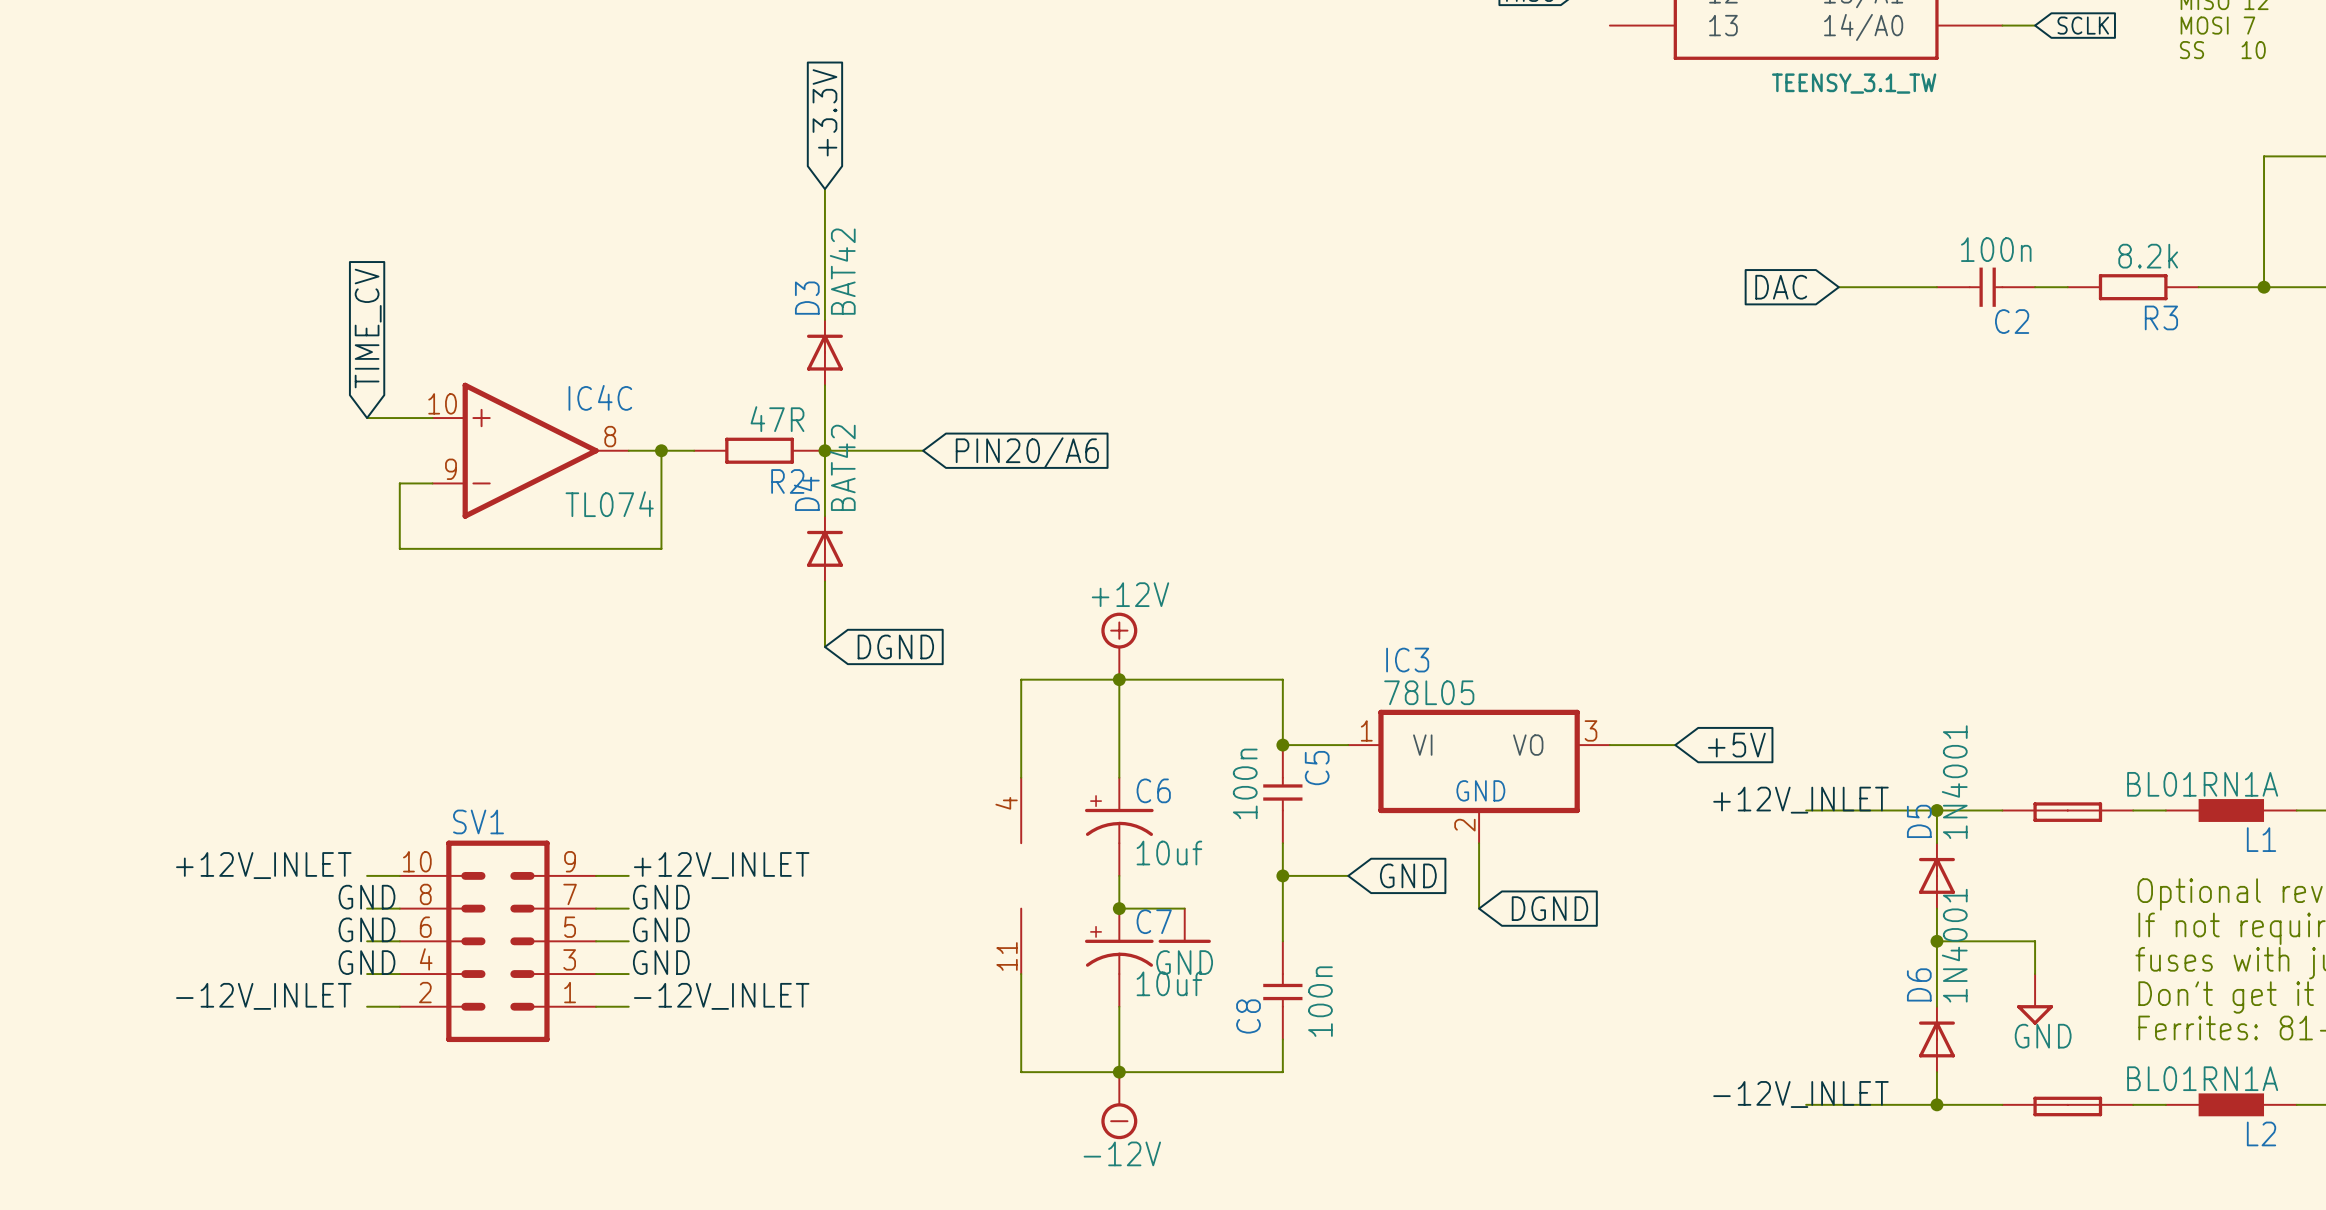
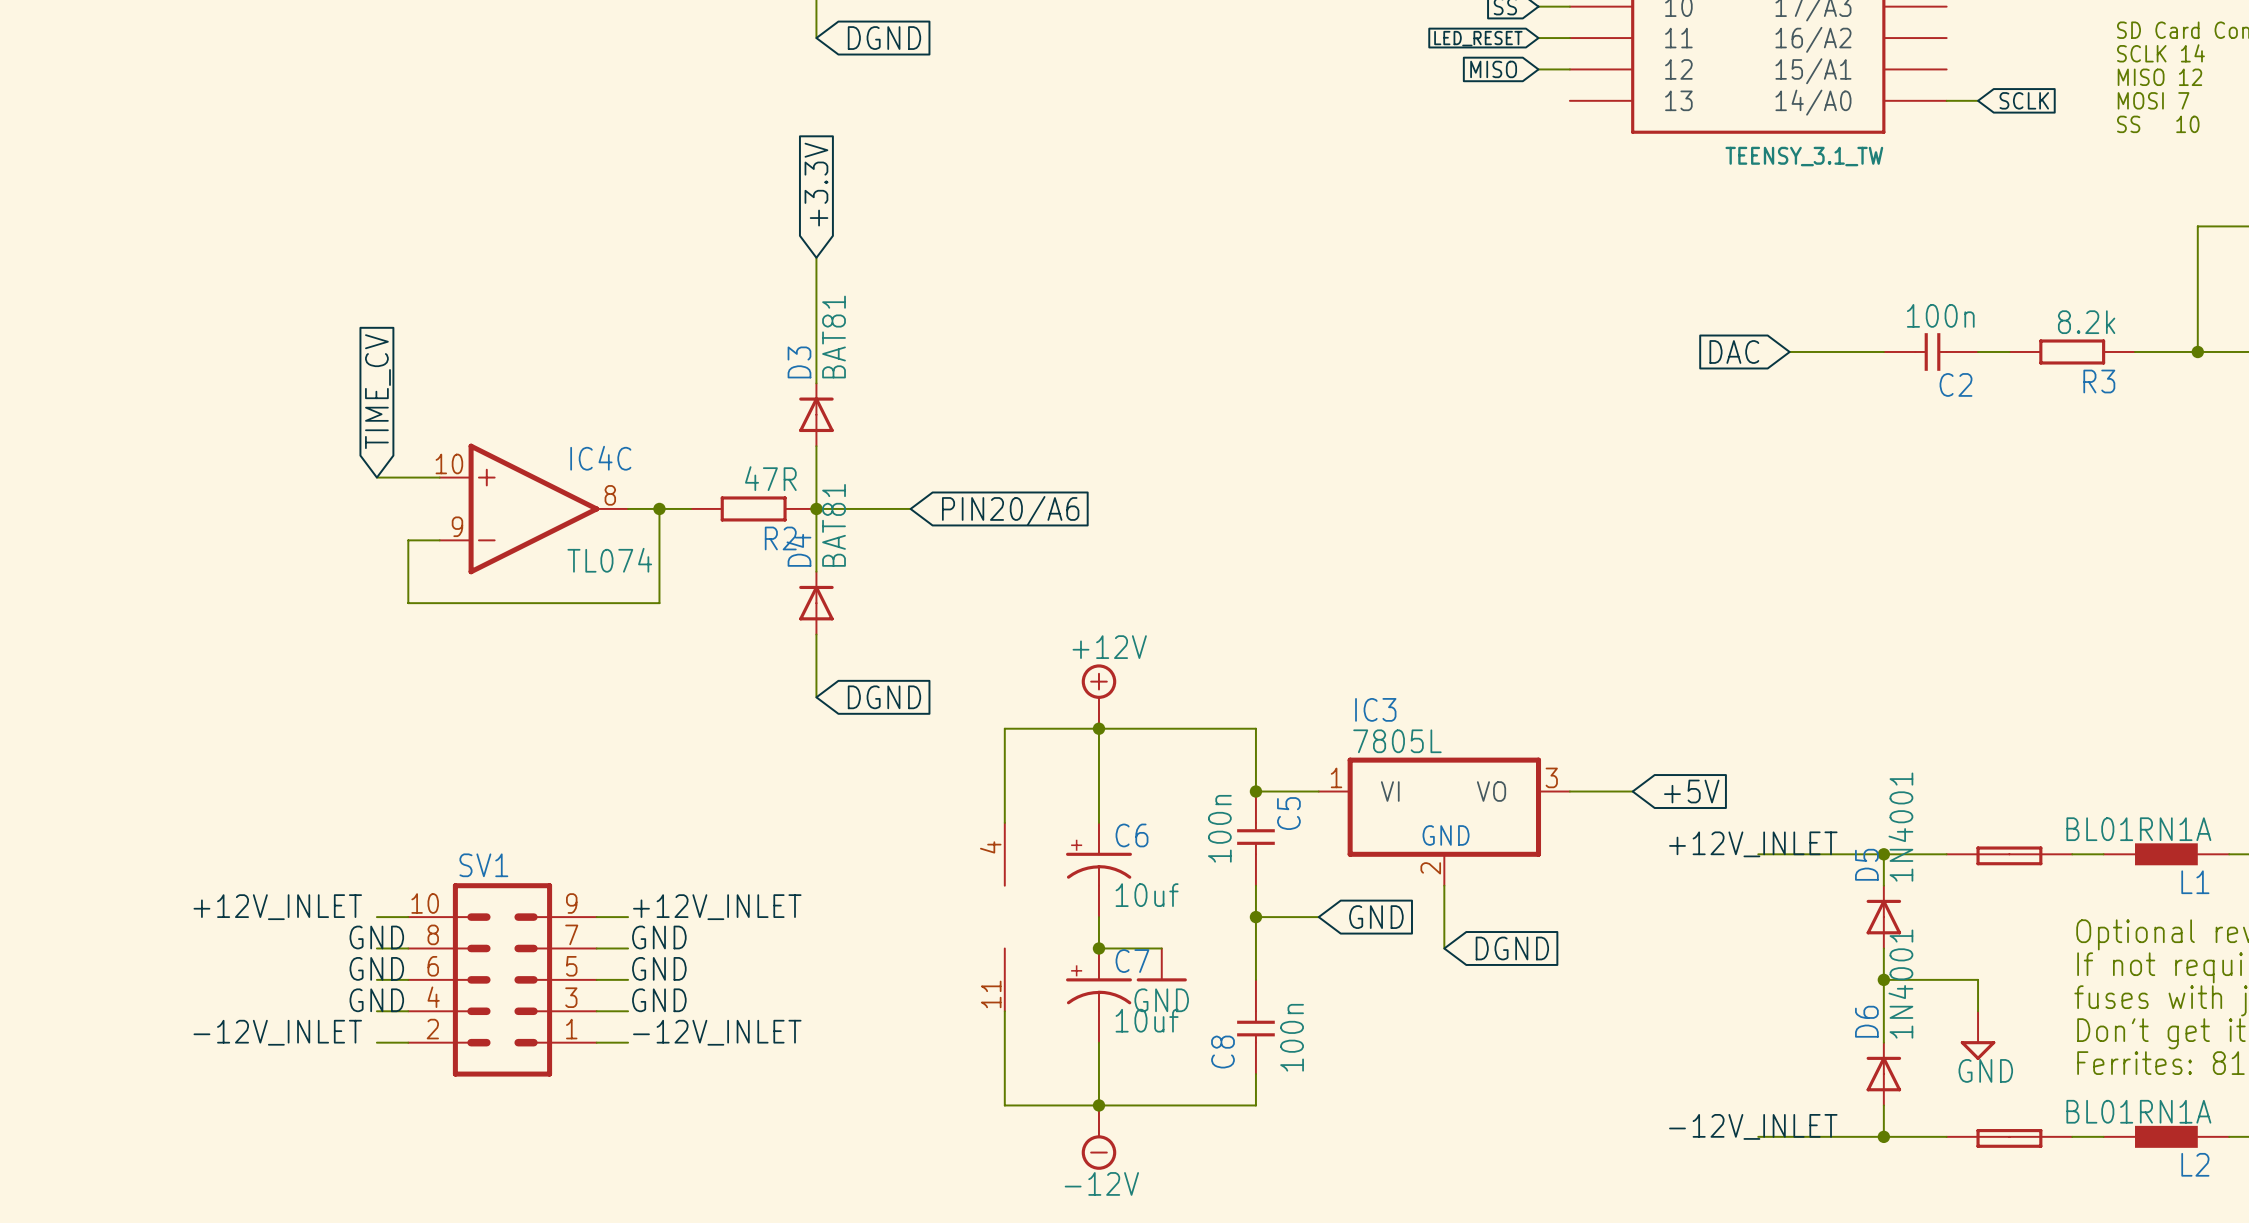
D3 value: BAT42 (842, 271) -> BAT81 (834, 337)
D4 value: BAT42 (842, 467) -> BAT81 (834, 525)
IC3 value: 78L05 (1429, 692) -> 7805L (1397, 741)

